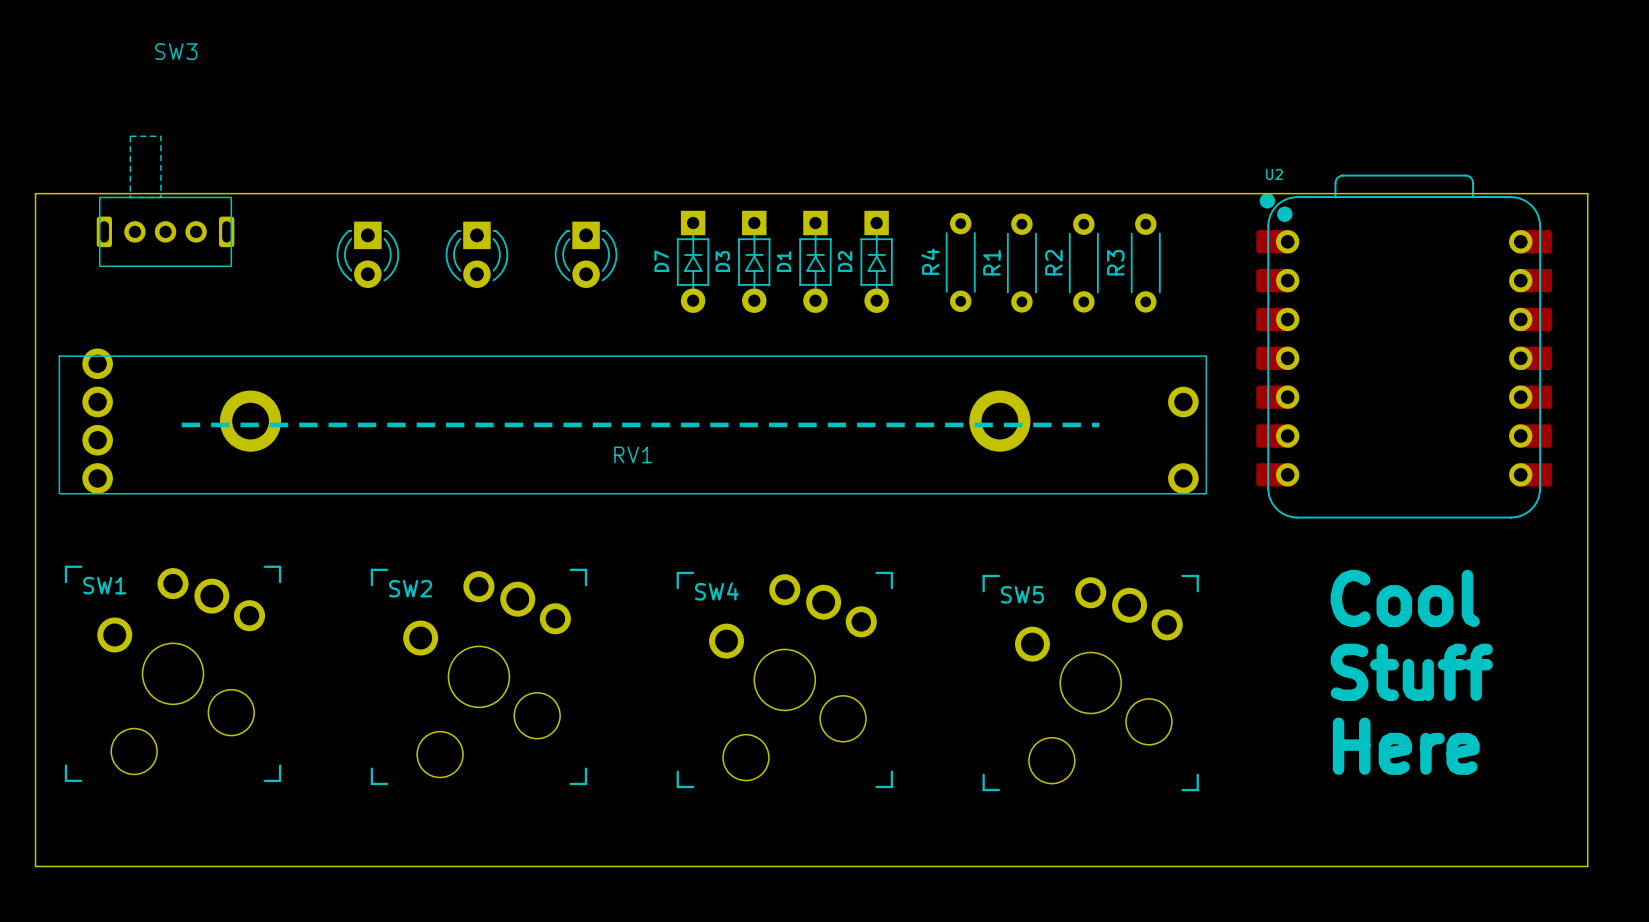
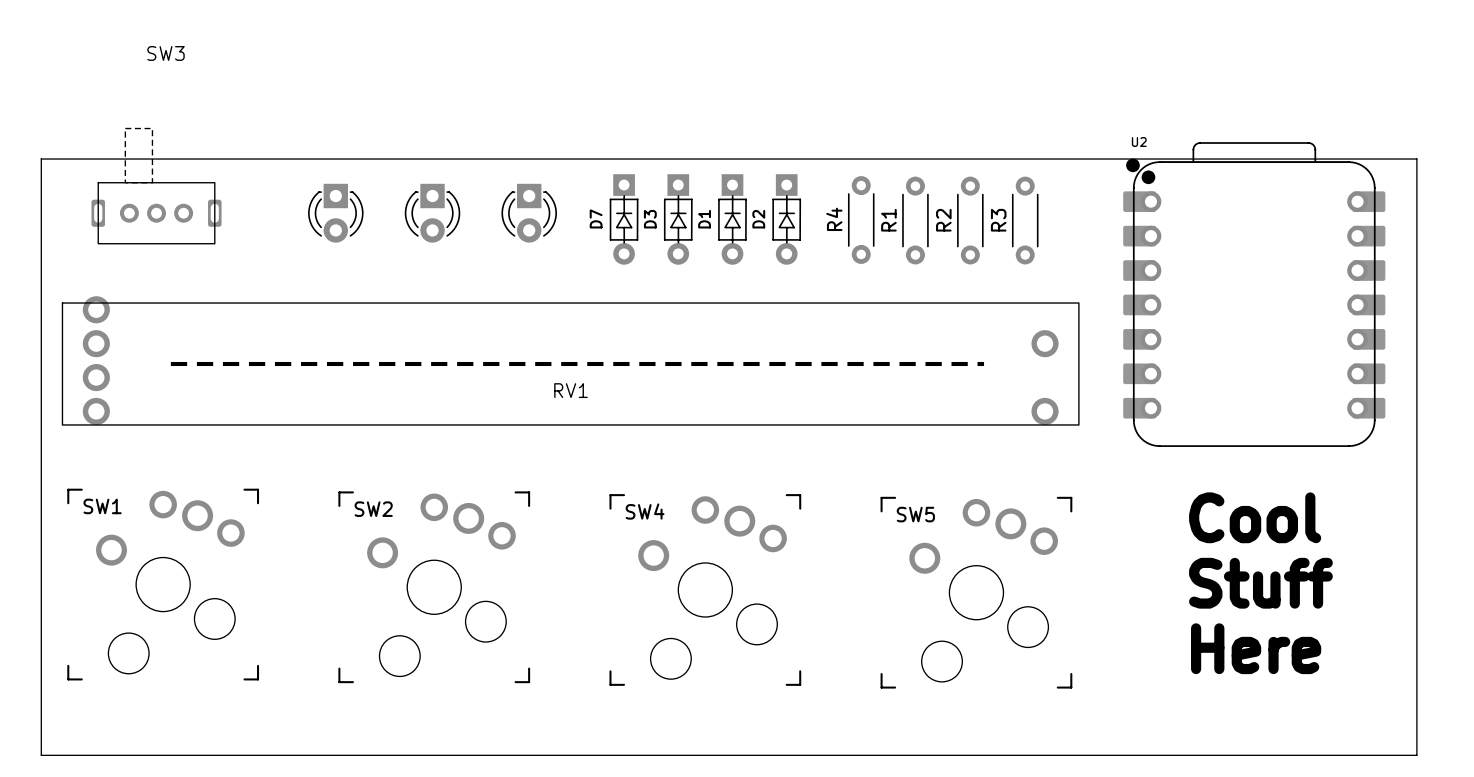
SW3 footprint: [96, 135, 235, 268] -> [91, 127, 222, 245]
RV1 footprint: [58, 348, 1208, 495] -> [61, 296, 1080, 426]

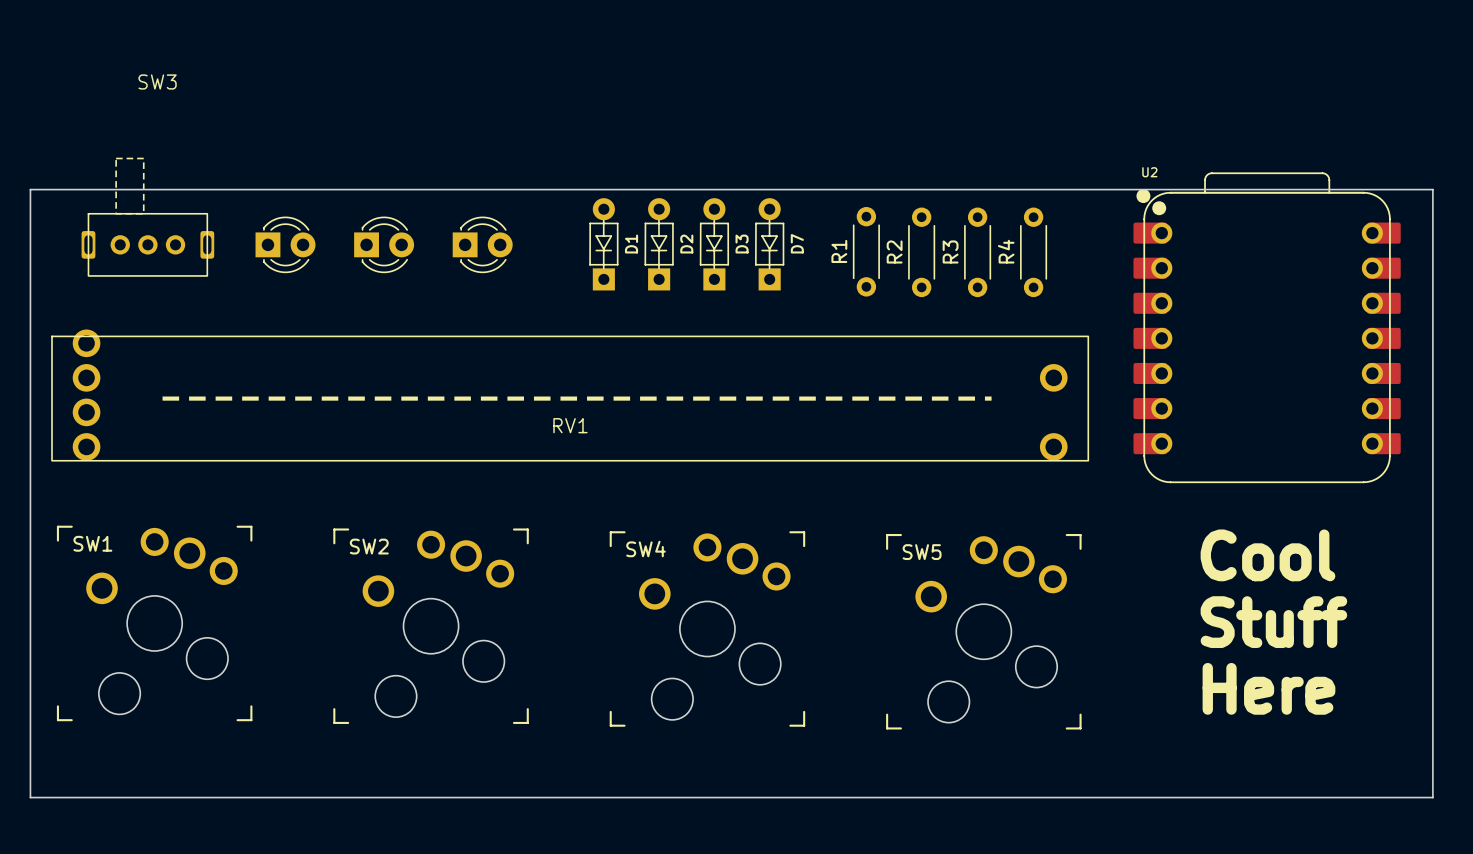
part: none -> (285, 244)
part: (335, 213) -> none
part: none -> (384, 244)
part: (432, 213) -> none
part rotation: 0° (529, 213) -> 90° counterclockwise (482, 244)
part position: (529, 213) -> (482, 244)
D7 rotation: 0° (624, 219) -> 180° (769, 244)
D7 position: (624, 219) -> (769, 244)
D3 rotation: 0° (678, 219) -> 180° (714, 244)
D1 rotation: 0° (732, 219) -> 180° (603, 244)
D1 position: (732, 219) -> (603, 244)
D2 rotation: 0° (786, 219) -> 180° (659, 244)
D2 position: (786, 219) -> (659, 244)
R4 name: R4 (834, 219) -> R1 (839, 251)
R1 name: R1 (888, 220) -> R2 (894, 251)
R2 name: R2 (943, 220) -> R3 (950, 251)
R3 name: R3 (998, 220) -> R4 (1006, 251)

